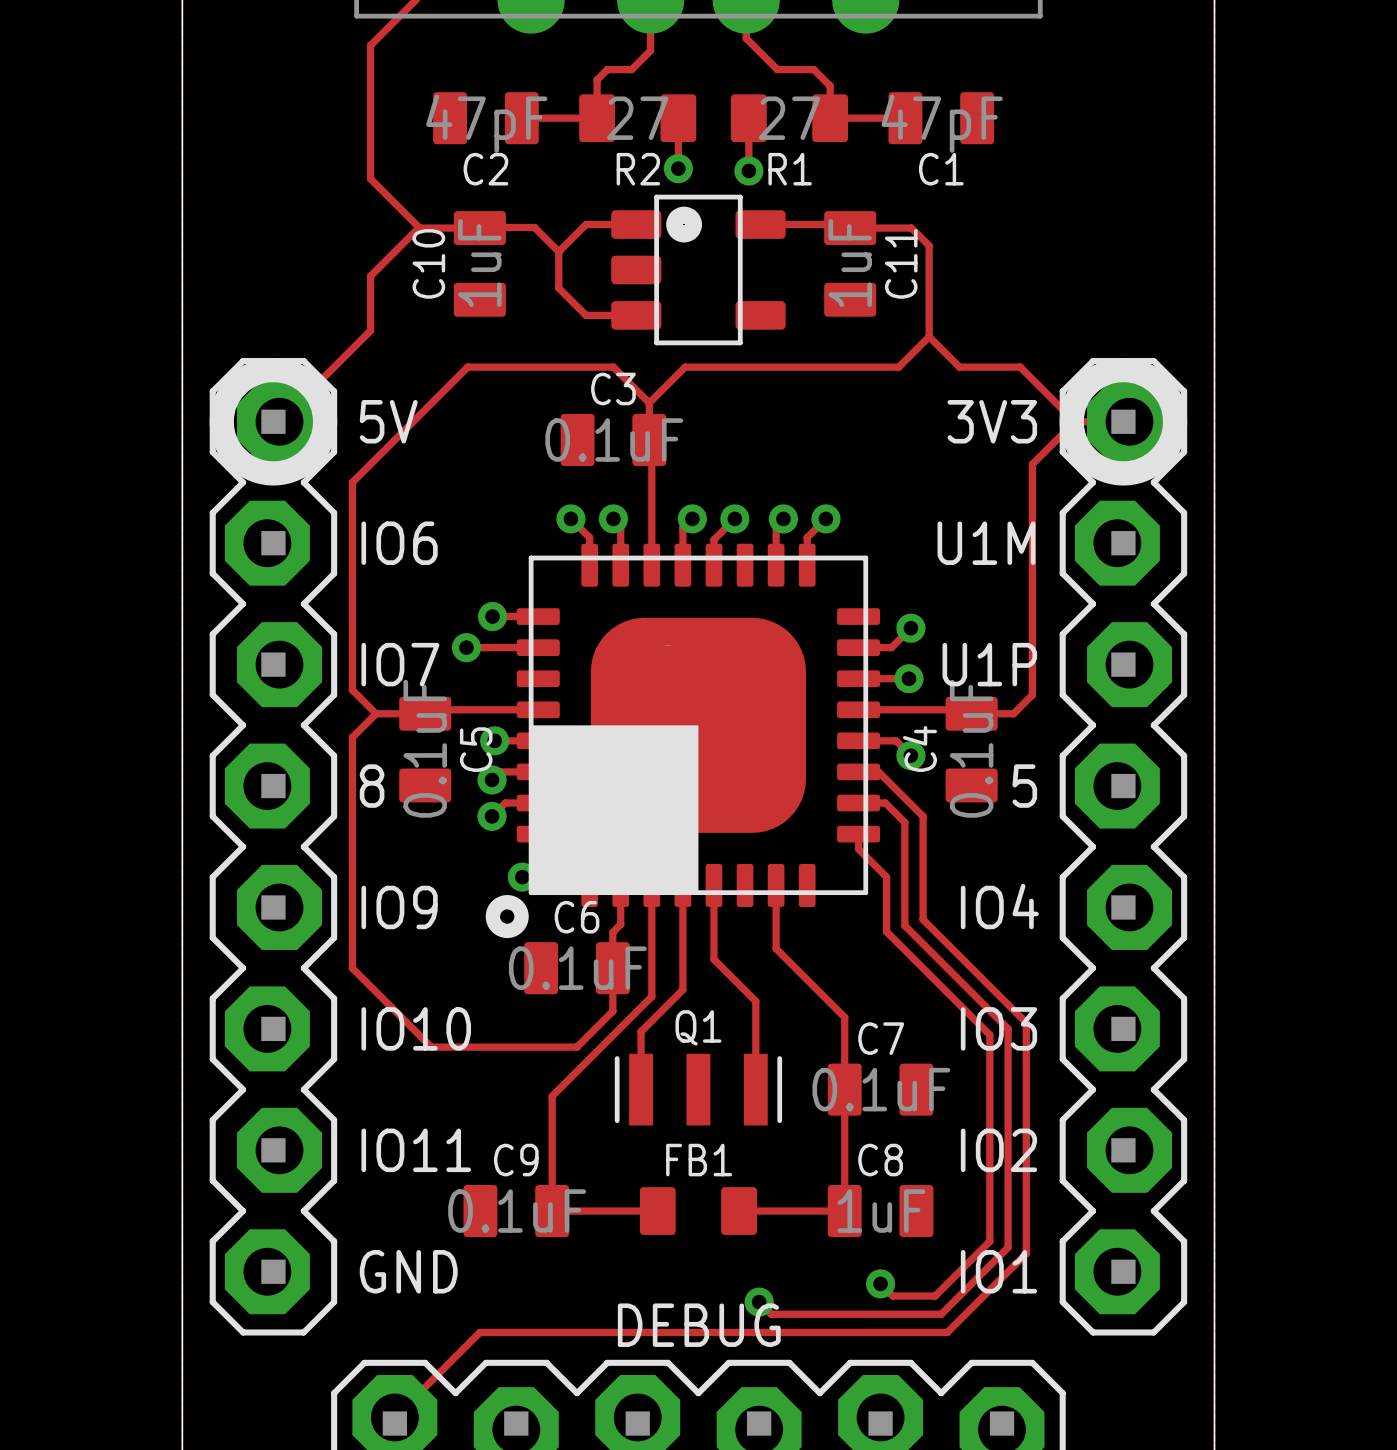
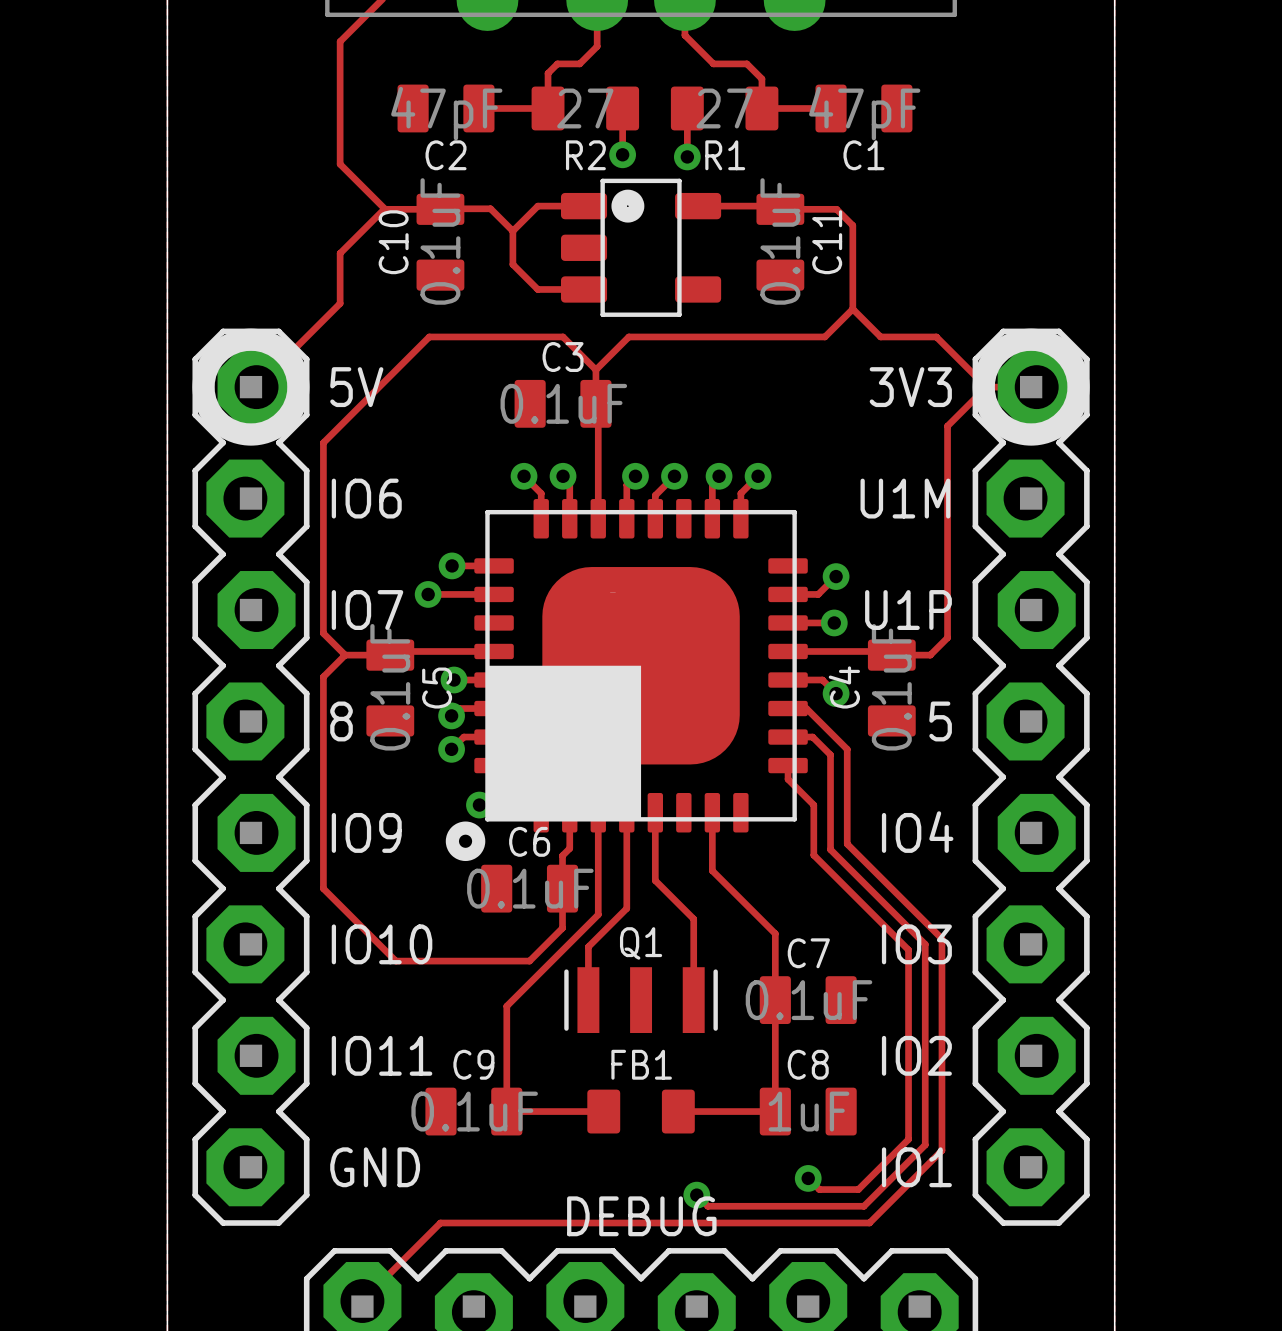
C10 value: 1uF (479, 263) -> 0.1uF (440, 241)
C11 value: 1uF (850, 263) -> 0.1uF (780, 241)

